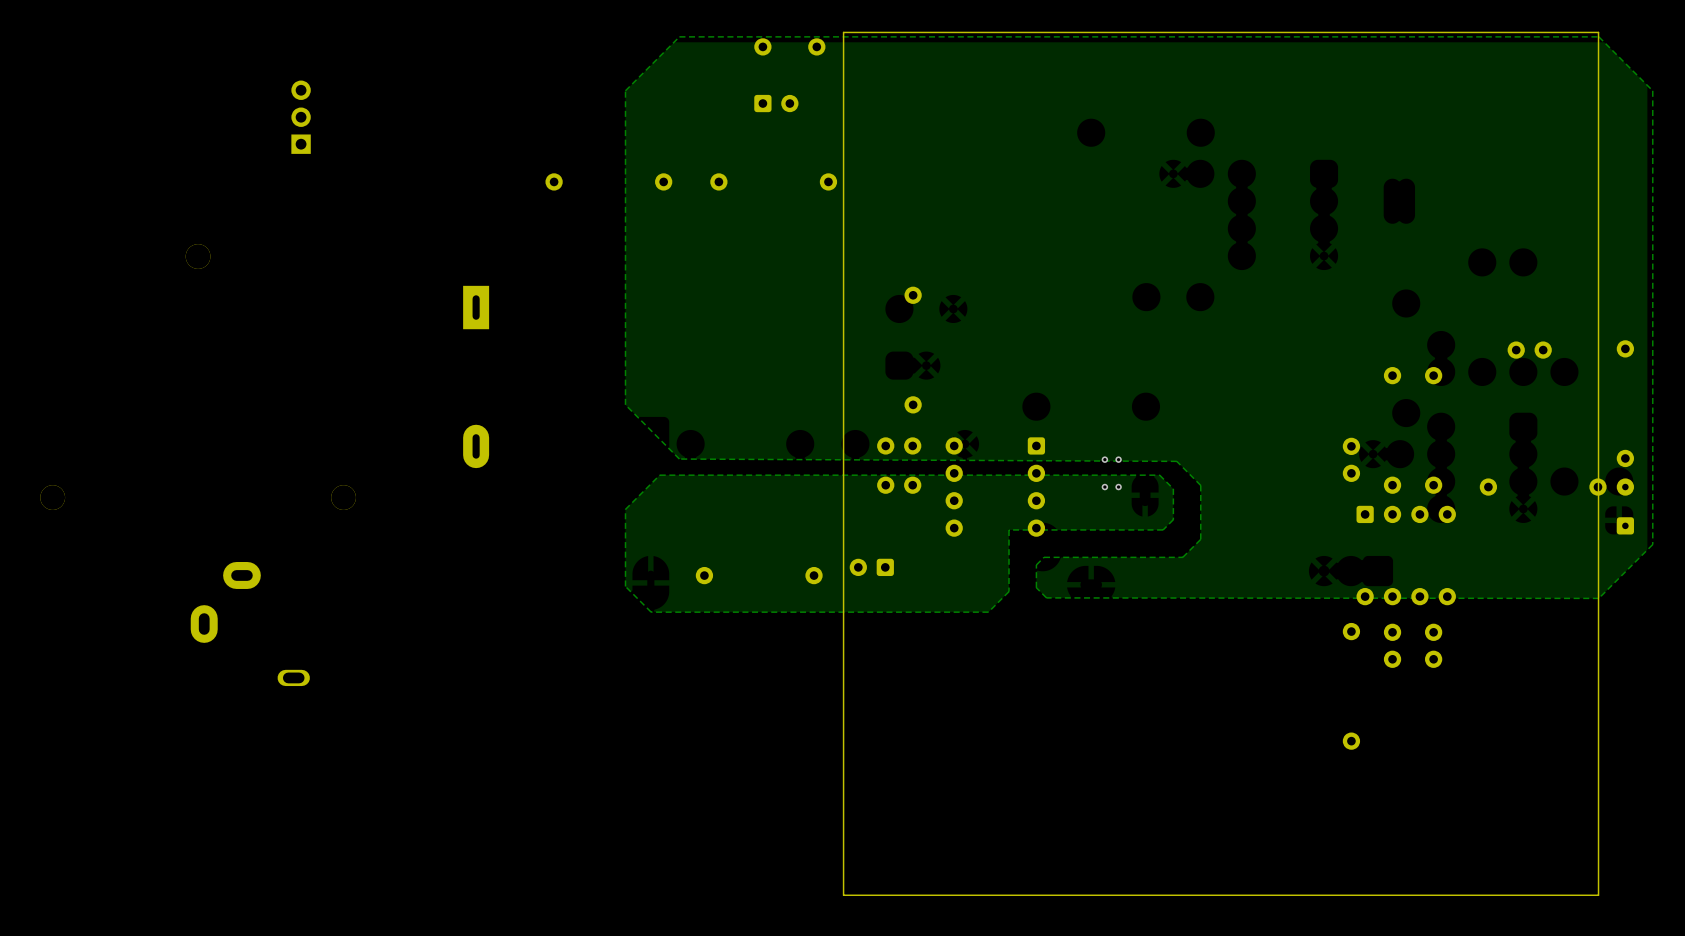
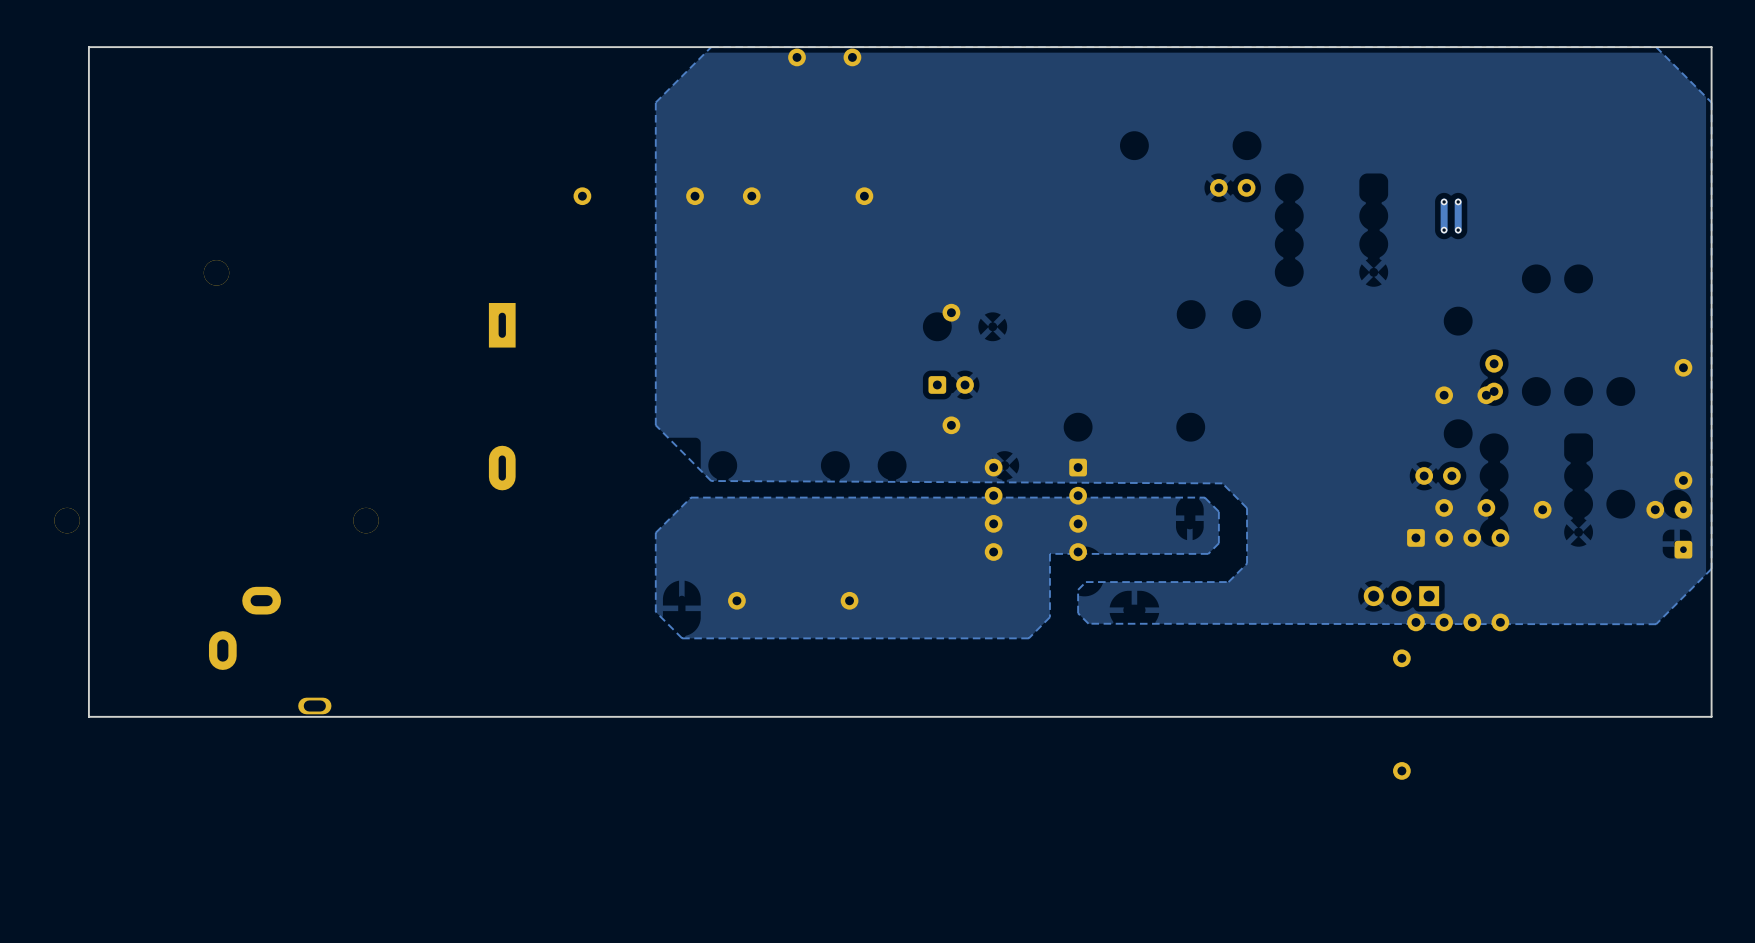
board edge: (1598, 32) (843, 32) (843, 895) (1598, 895) (1598, 32) -> none
board edge: none -> (1711, 47) (88, 47) (88, 716) (1711, 716) (1711, 47)
part: (776, 103) -> none
part: (301, 117) -> none
part: none -> (1232, 187)
track: none -> (1444, 201) (1444, 230)
via: none -> (1444, 201)
track: none -> (1458, 201) (1458, 230)
via: none -> (1458, 201)
via: none -> (1444, 230)
via: none -> (1458, 230)
part: (1529, 350) -> none
part: none -> (1494, 377)
part: none -> (951, 384)
part: (899, 445) -> none
via: (1104, 459) -> none
via: (1118, 459) -> none
part rotation: 0° (1351, 459) -> 90° clockwise (1438, 475)
part position: (1351, 459) -> (1438, 475)
part: (899, 485) -> none
via: (1104, 487) -> none
via: (1118, 487) -> none
part: (871, 567) -> none
part: none -> (1401, 596)
part: (1392, 645) -> none
part: (1433, 645) -> none

